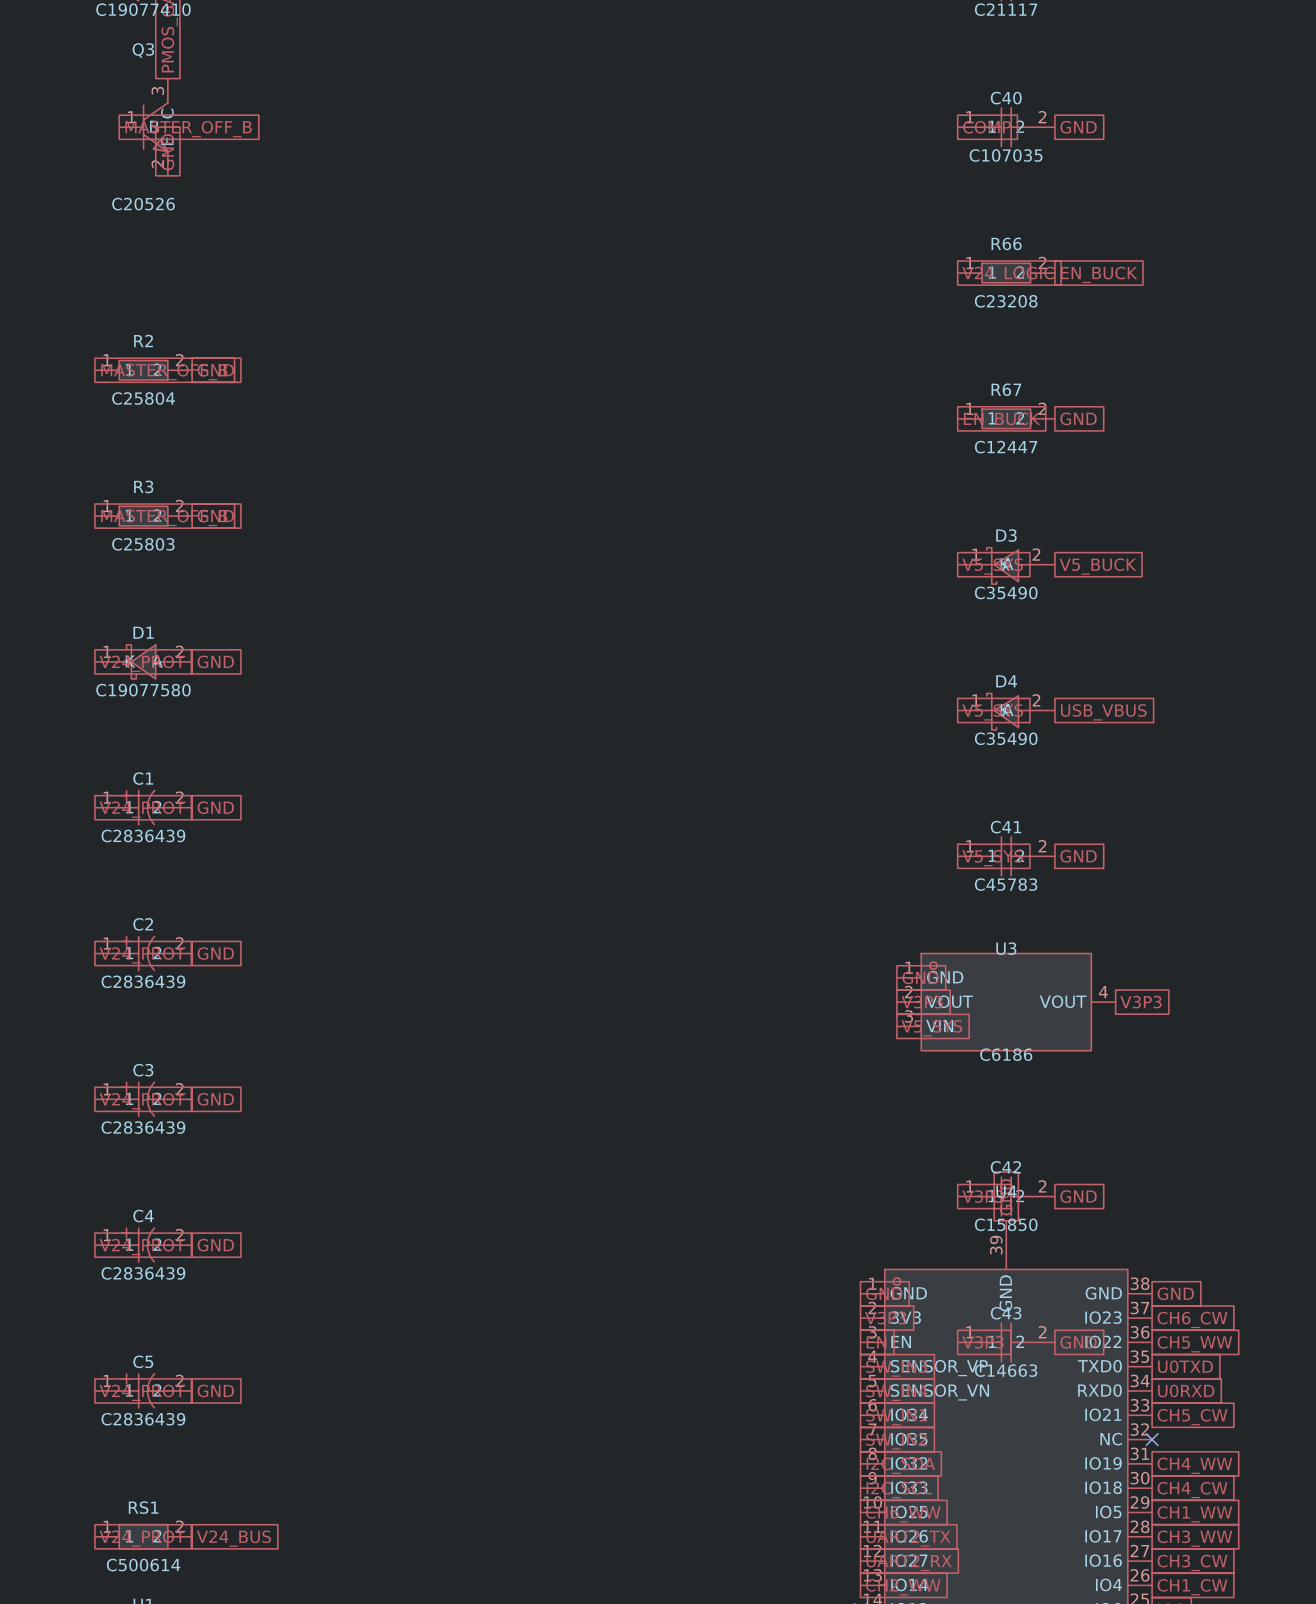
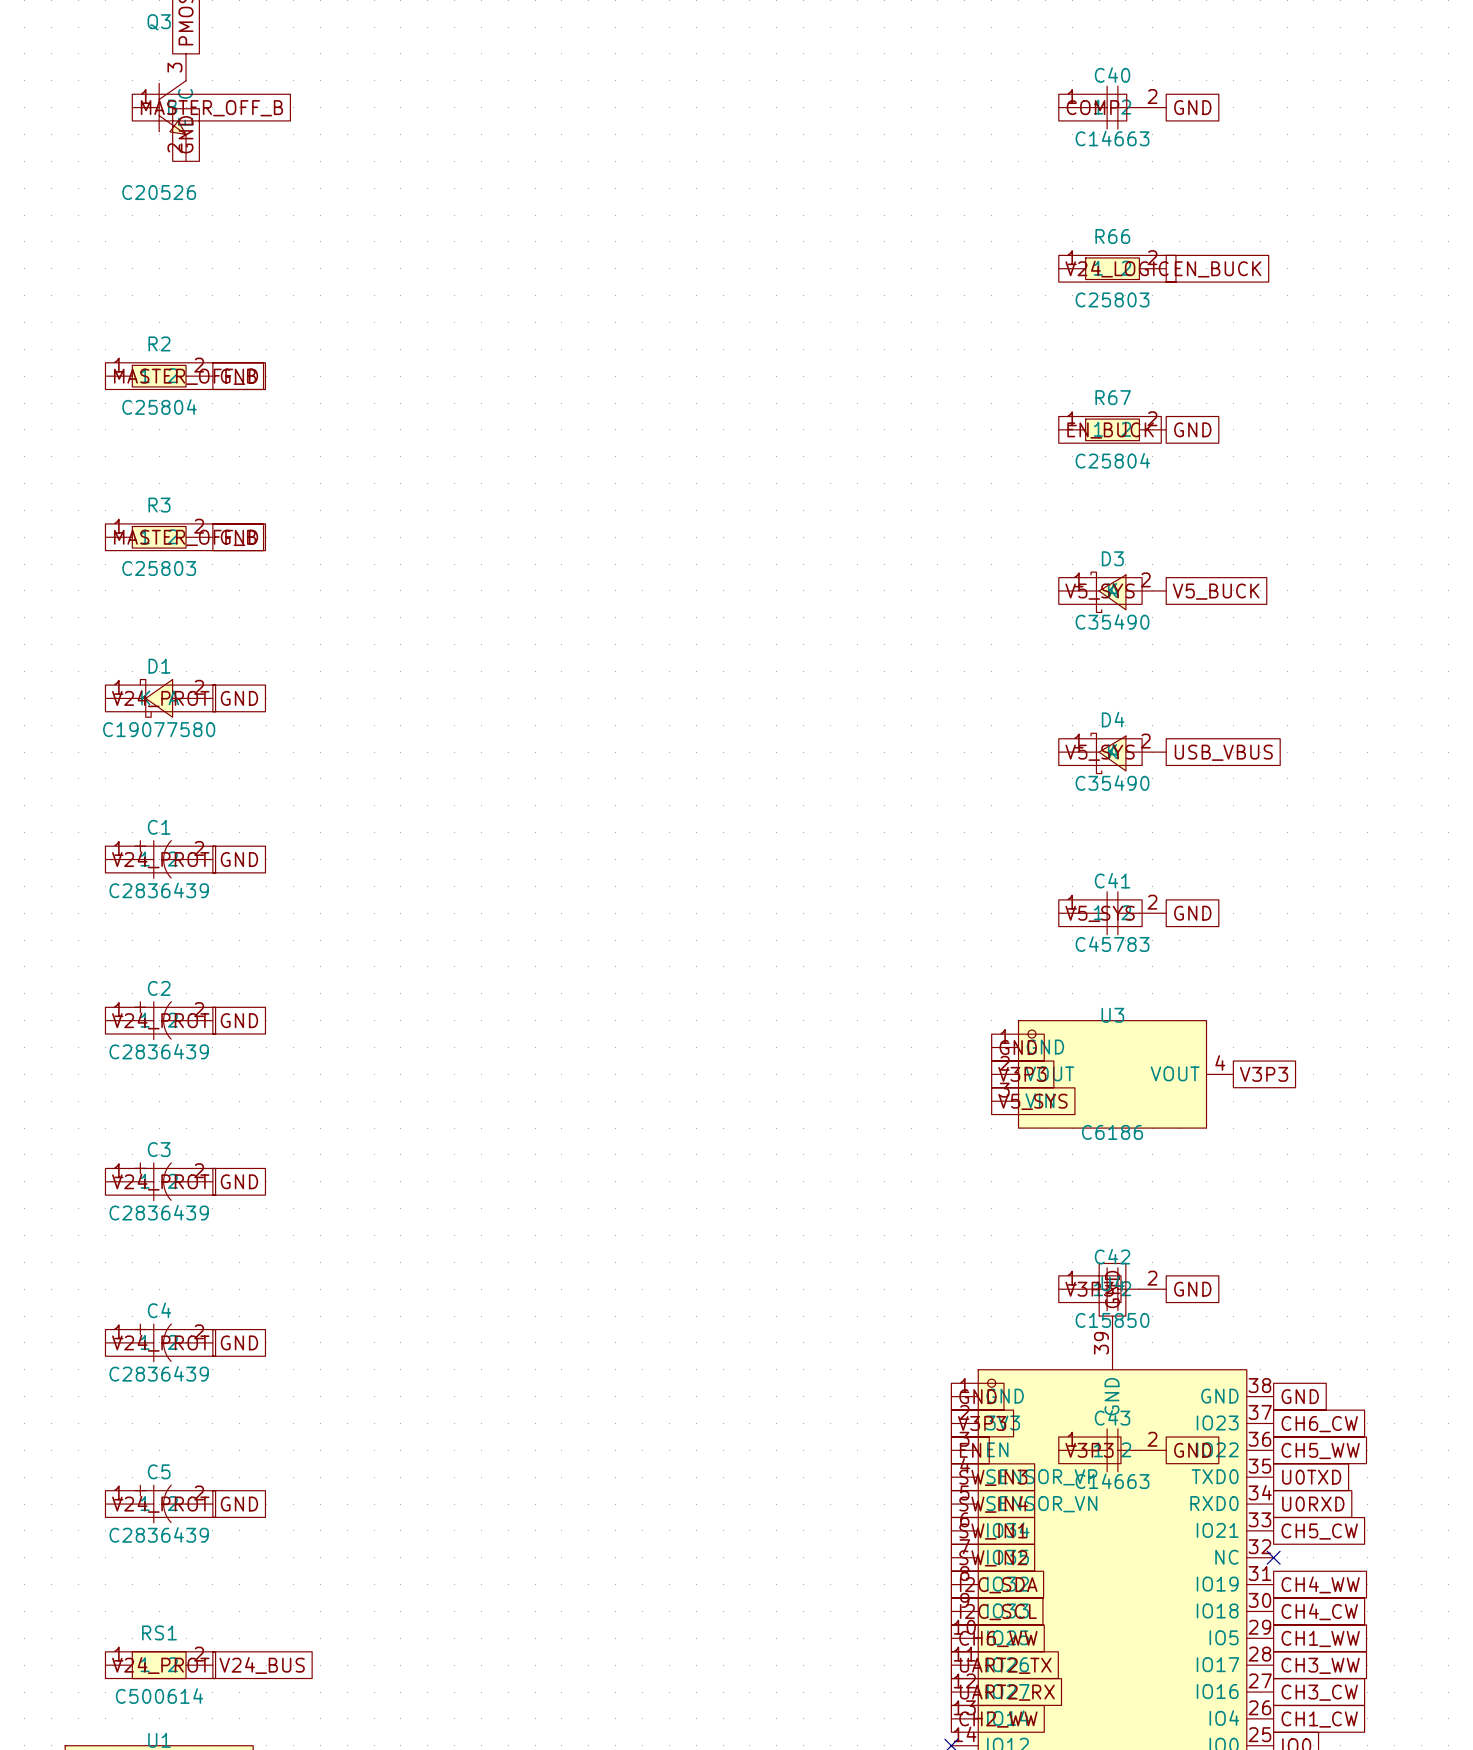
C40 value: C107035 (1006, 155) -> C14663 (1112, 138)
R66 value: C23208 (1006, 301) -> C25803 (1112, 299)
R67 value: C12447 (1006, 447) -> C25804 (1112, 460)

